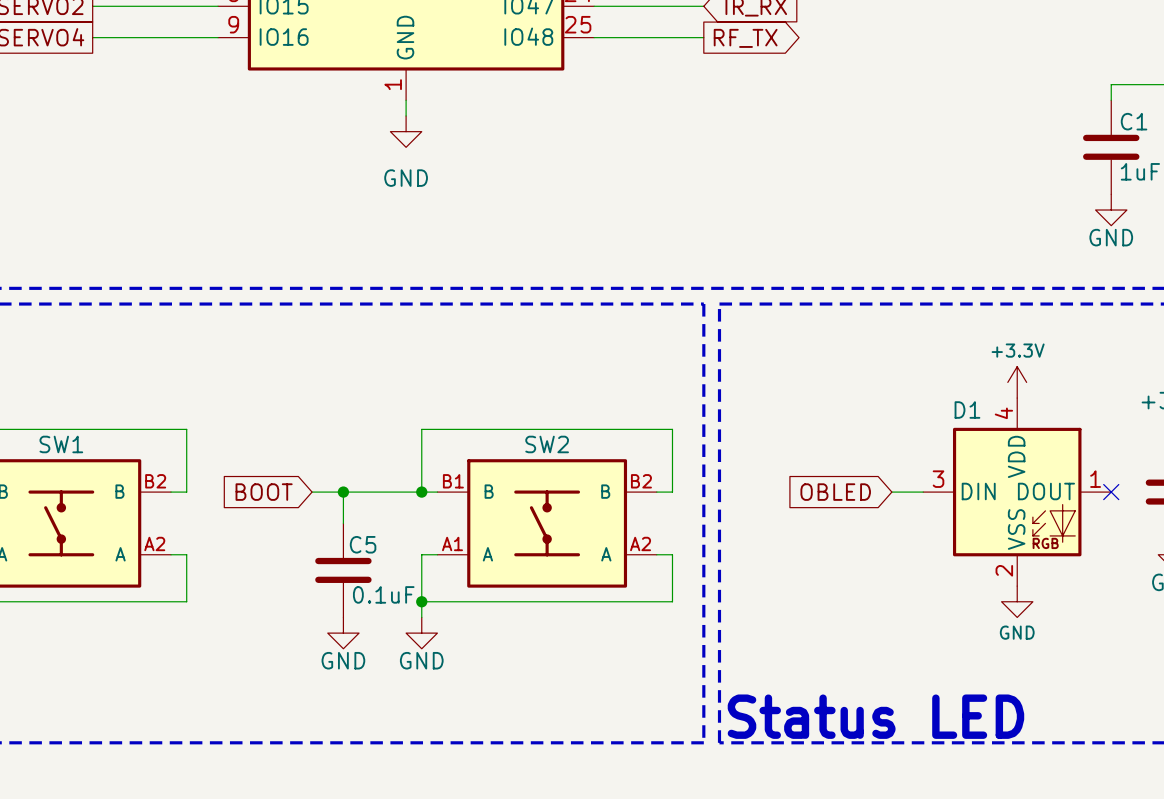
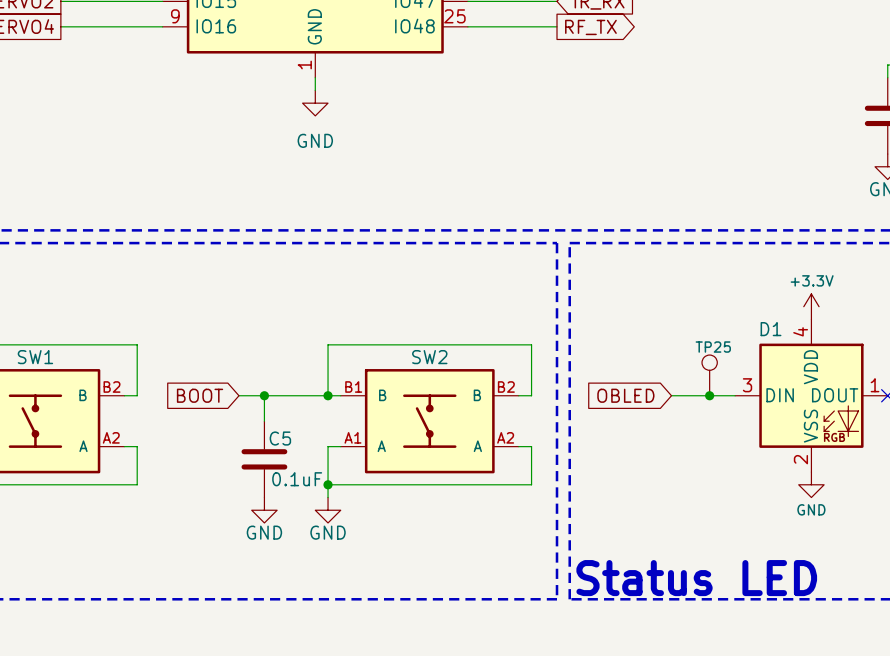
TP25: none -> (709, 375)
global label position: OBLED (835, 492) -> OBLED (625, 395)
wire: none -> (671, 395) (709, 395)
junction: none -> (709, 395)

